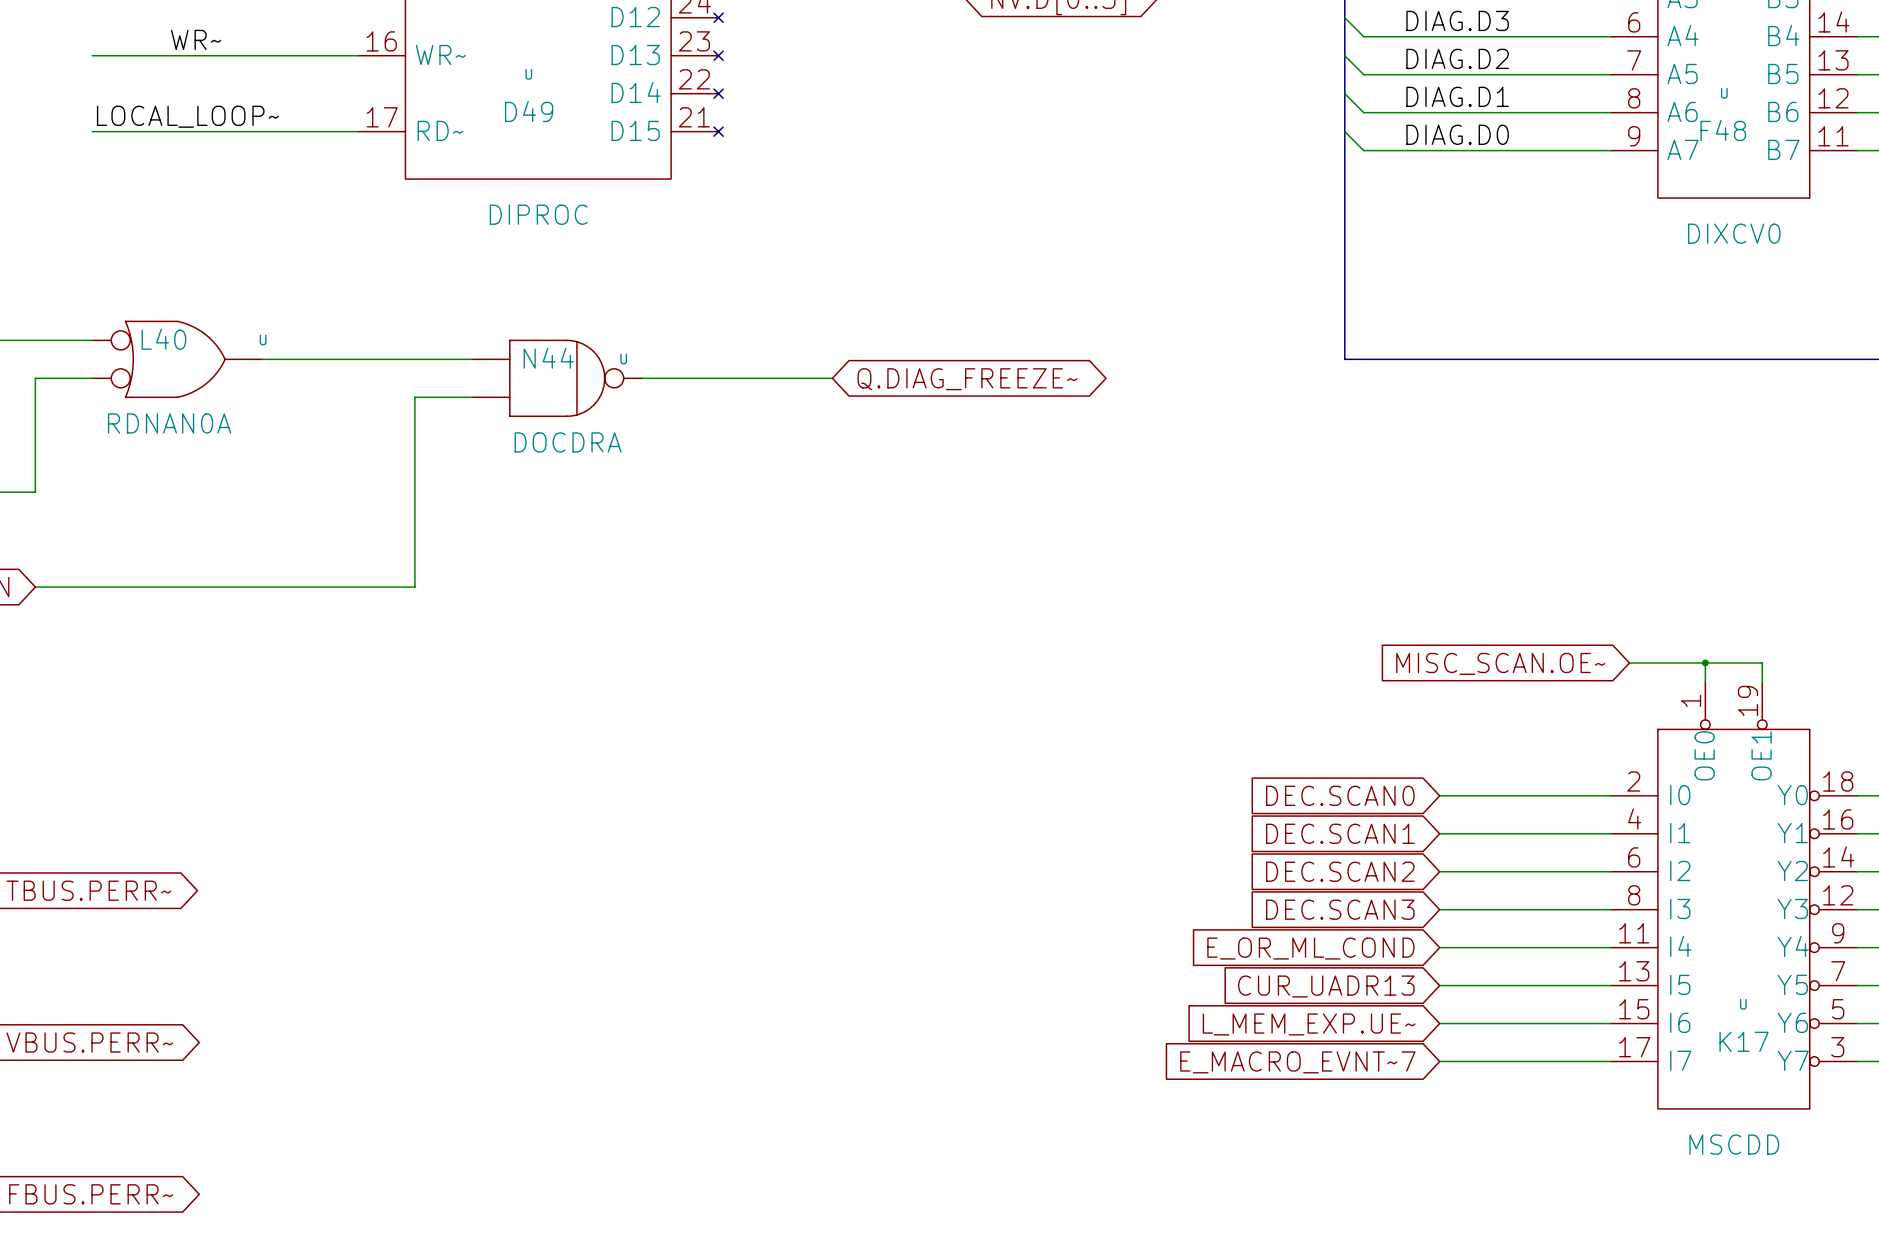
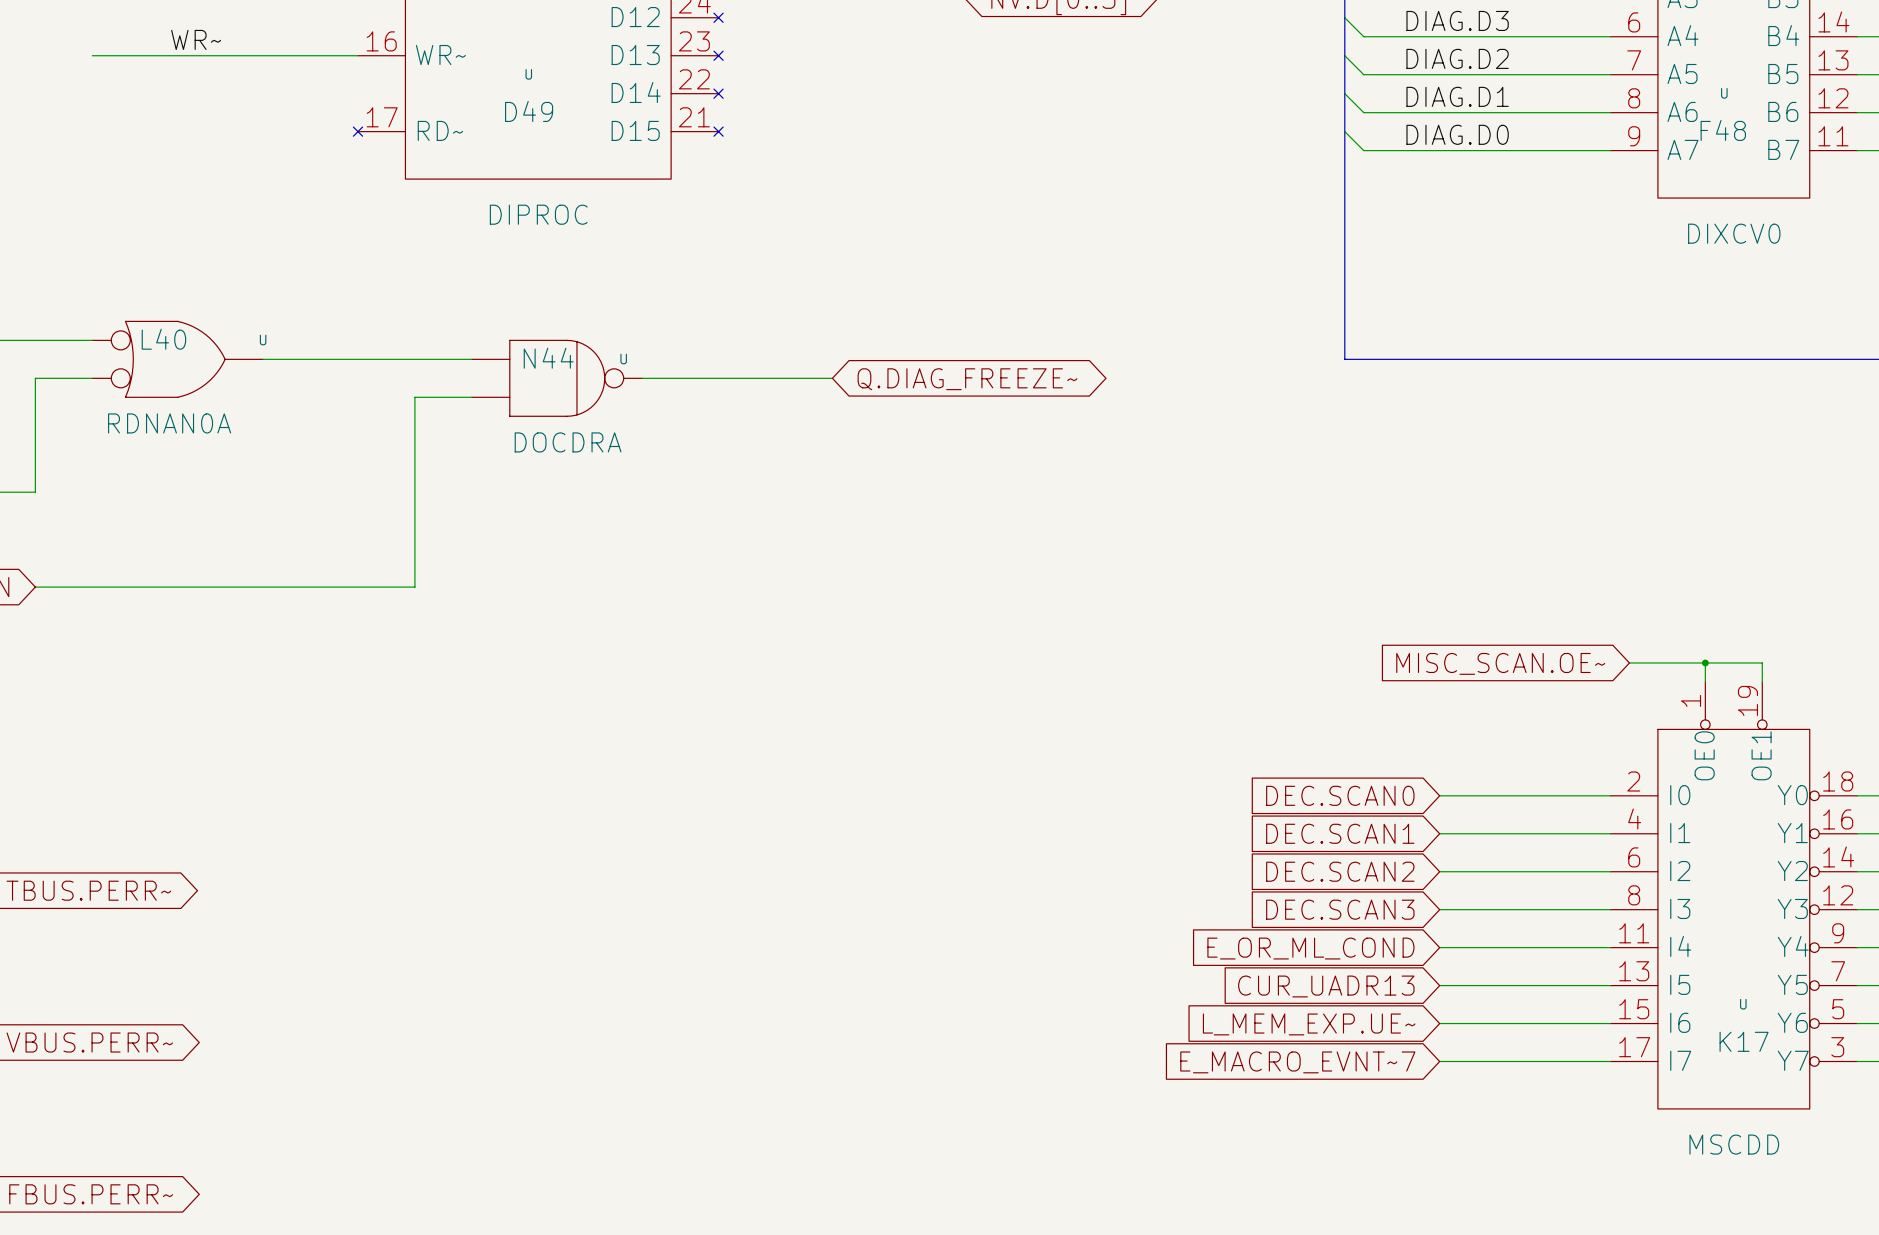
label: LOCAL_LOOP~ (187, 116) -> none
wire: (92, 131) (357, 131) -> none
no-connect mark: none -> (357, 131)

